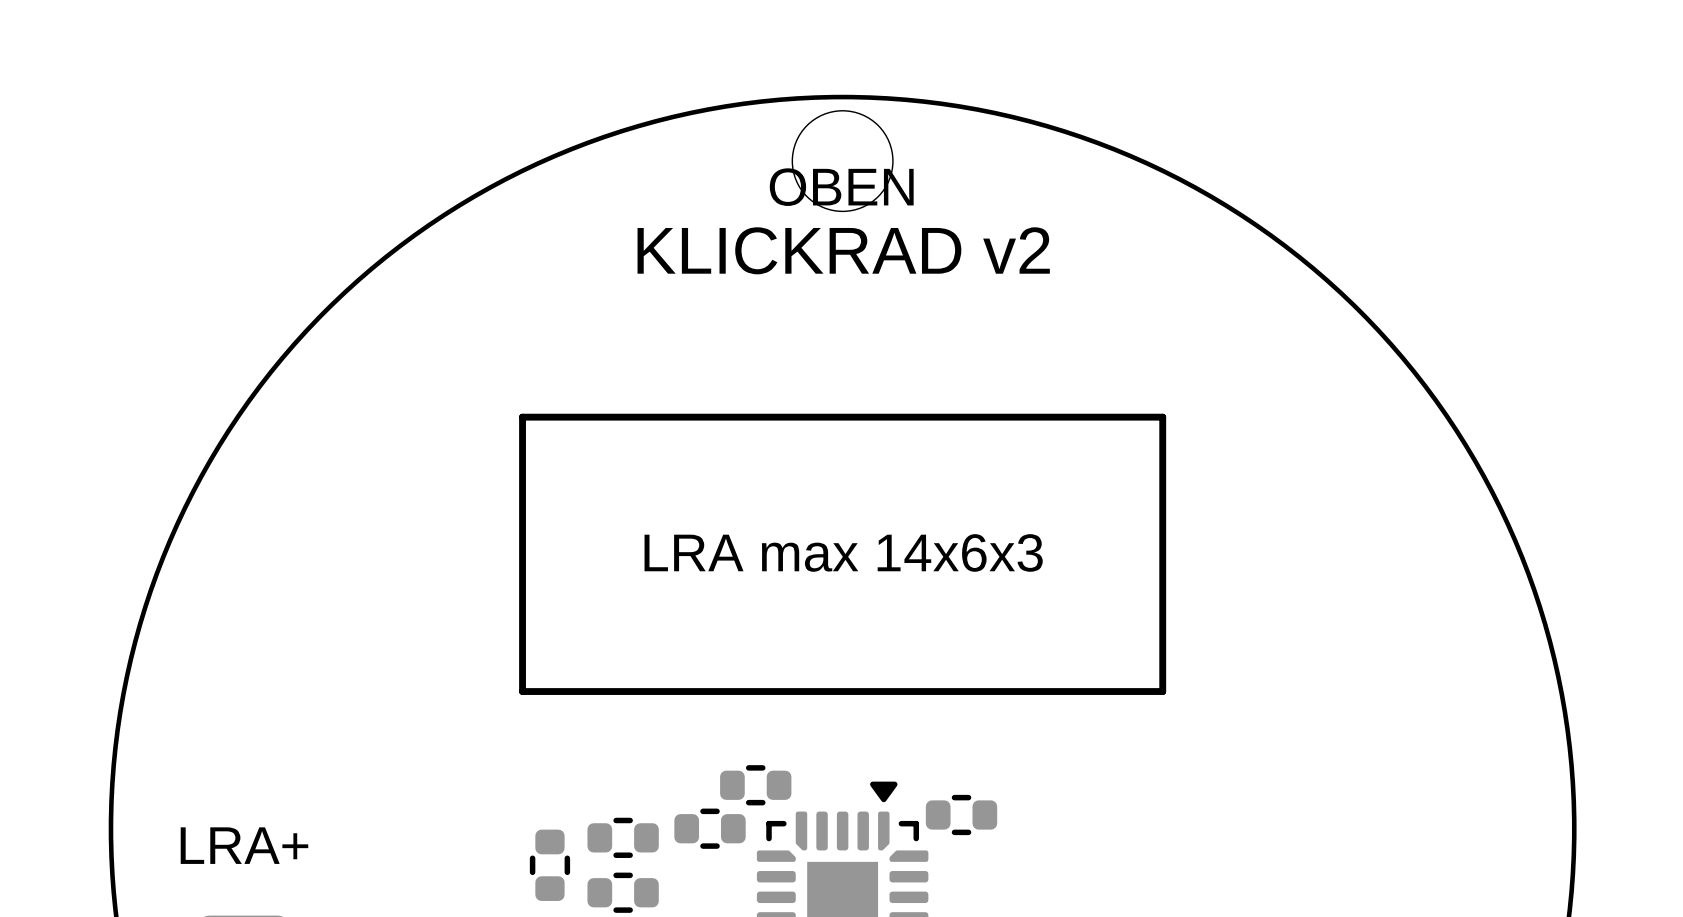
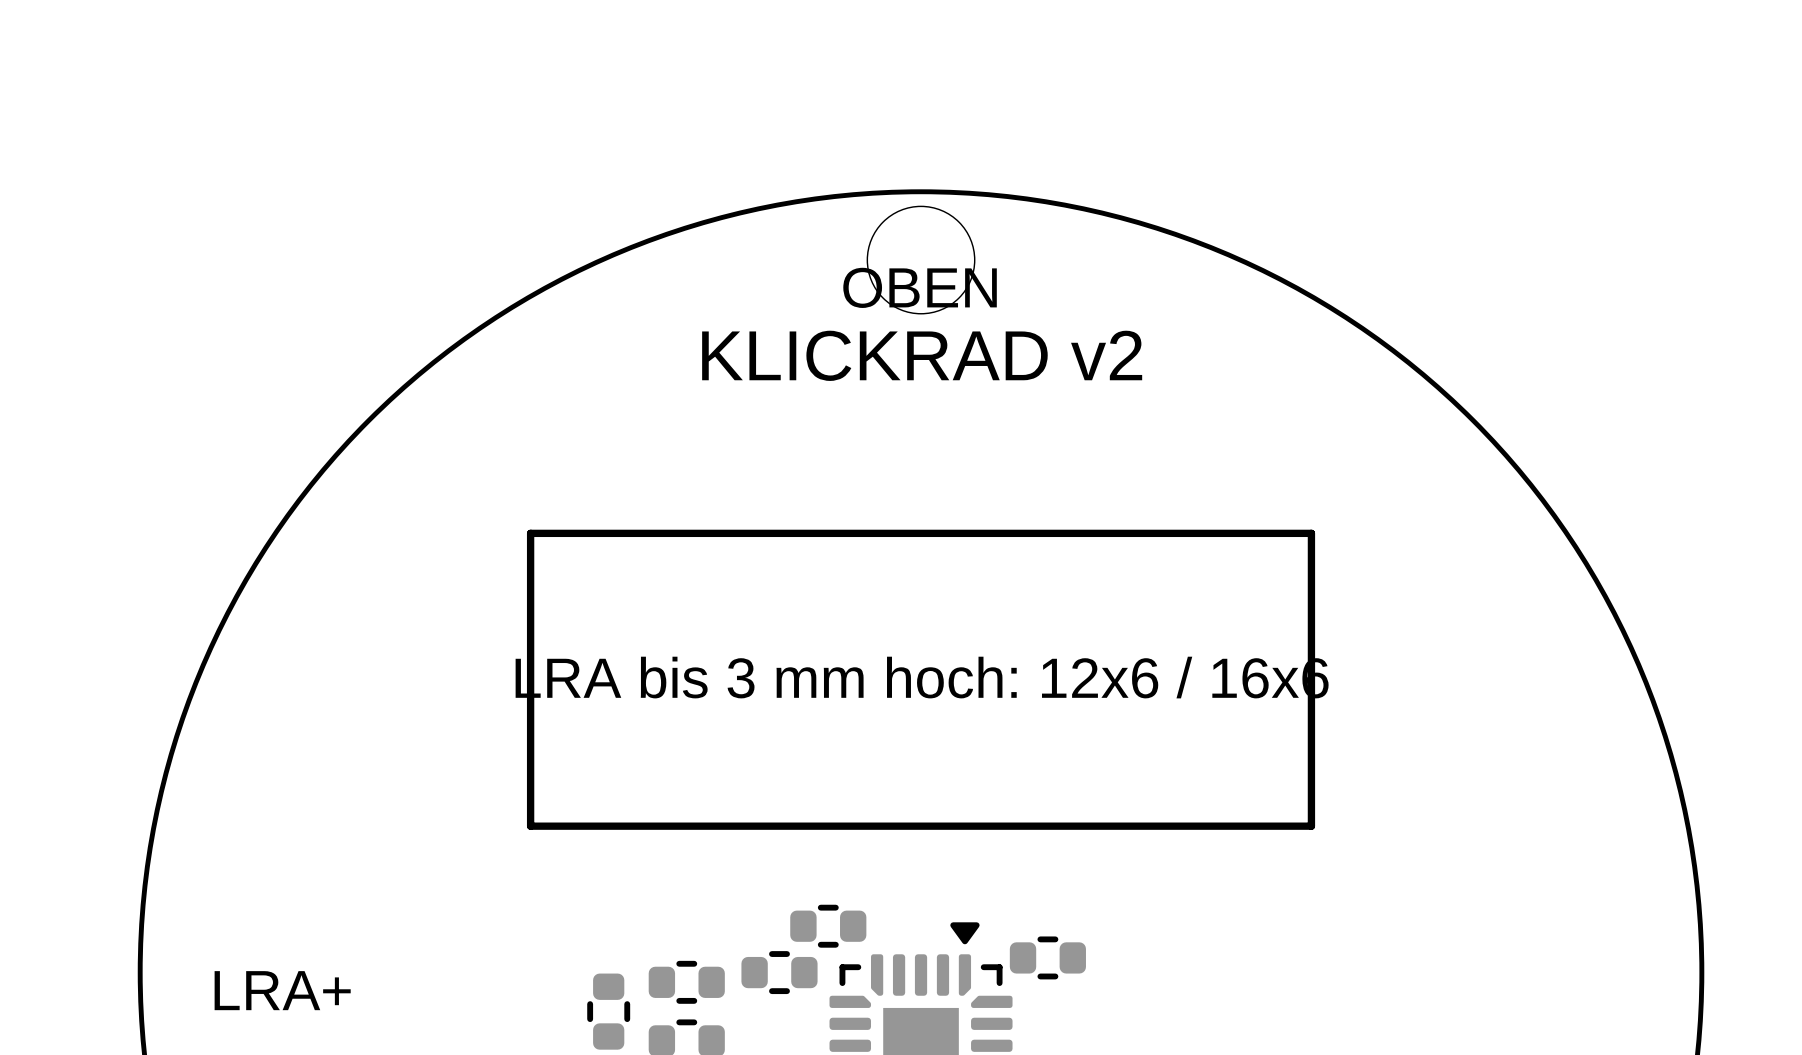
line: (522, 417) (522, 691) -> (579, 533) (530, 533) (530, 826) (579, 826)
line: (1162, 417) (1162, 691) -> (1262, 533) (1311, 533) (1311, 826) (1262, 826)
text: LRA max 14x6x3 (843, 552) -> LRA bis 3 mm hoch: 12x6 / 16x6 (922, 677)

